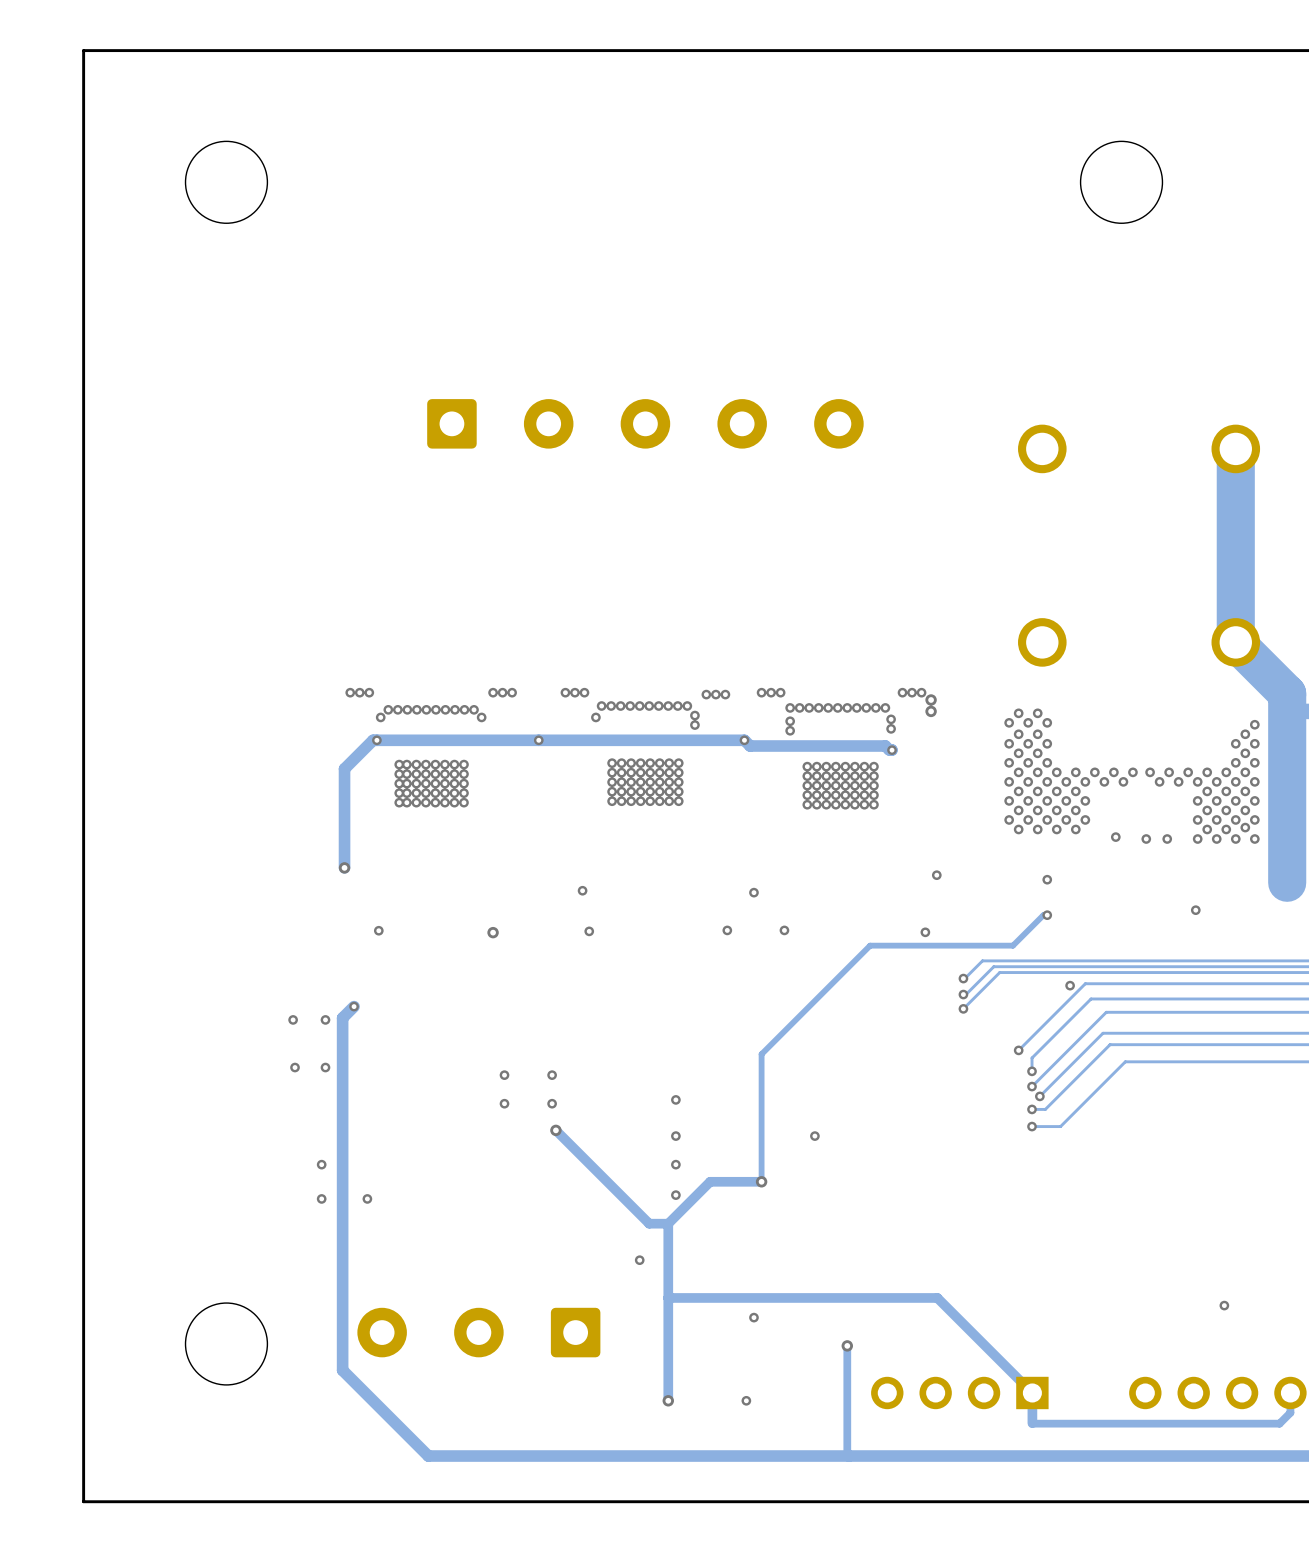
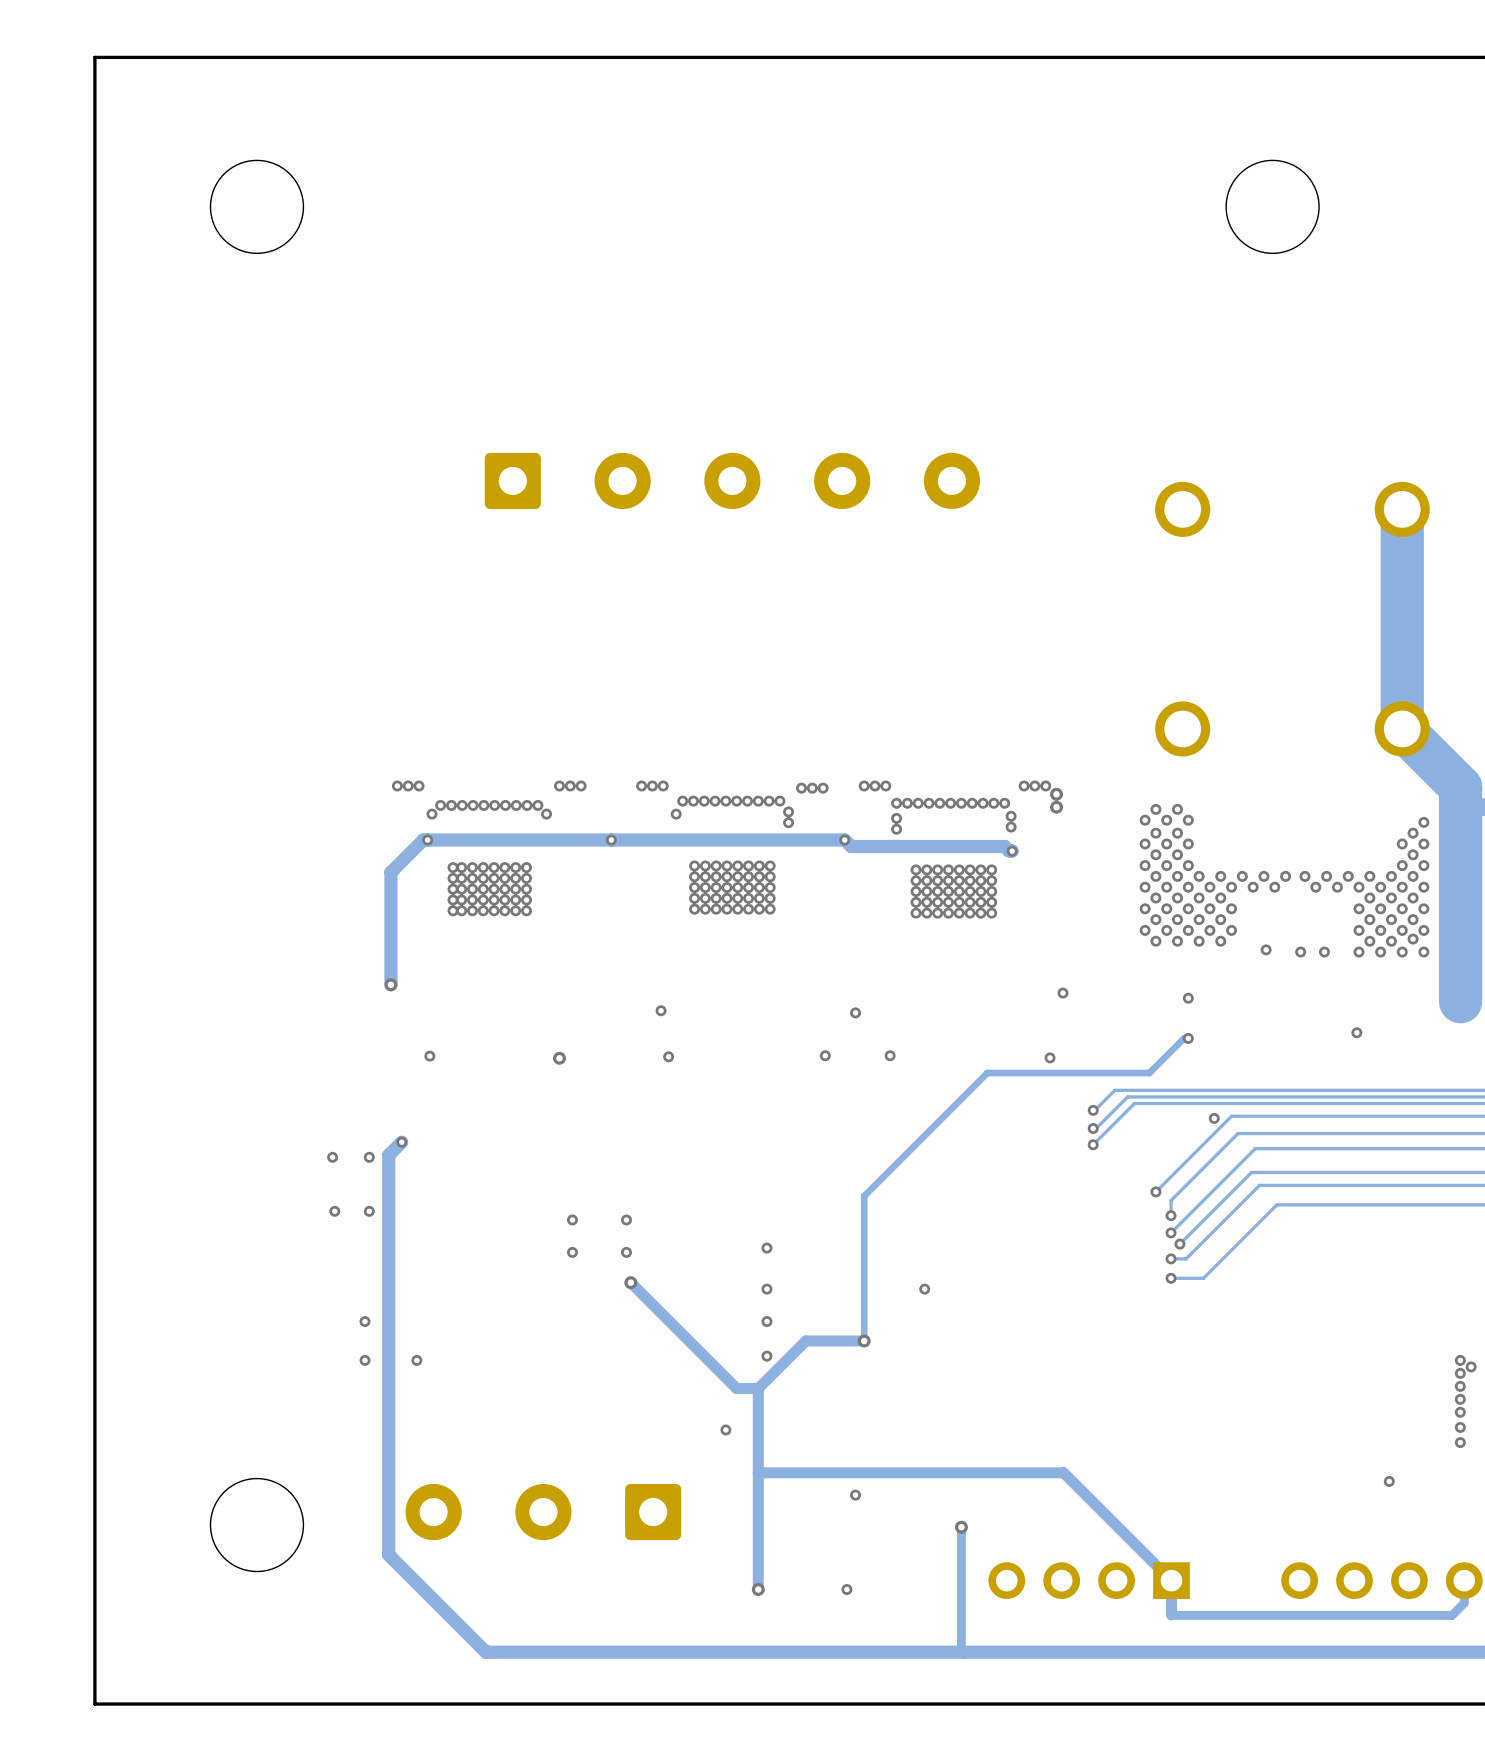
via: none -> (1460, 1360)
via: none -> (1471, 1366)
via: none -> (1460, 1373)
via: none -> (1460, 1386)
via: none -> (1460, 1399)
via: none -> (1460, 1412)
via: none -> (1460, 1427)
via: none -> (1460, 1442)

